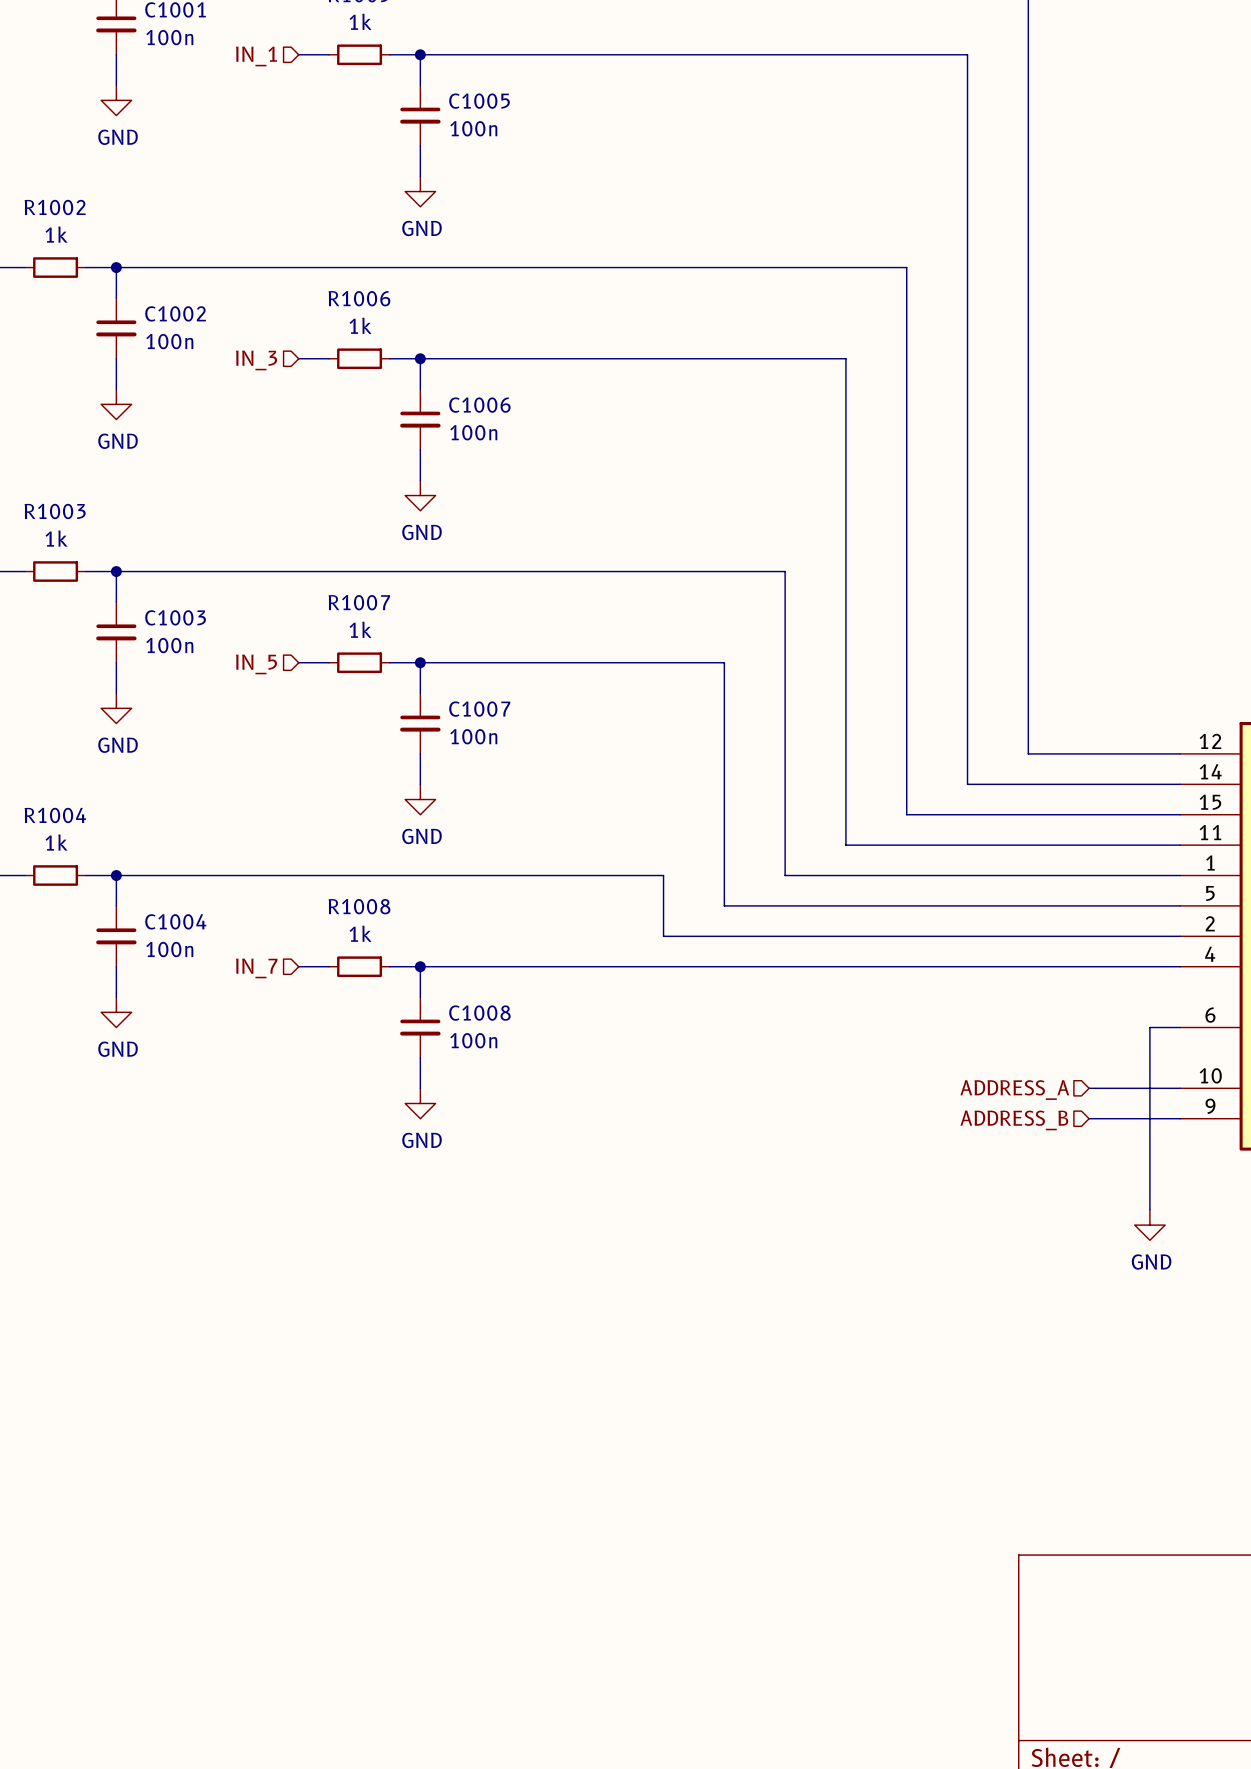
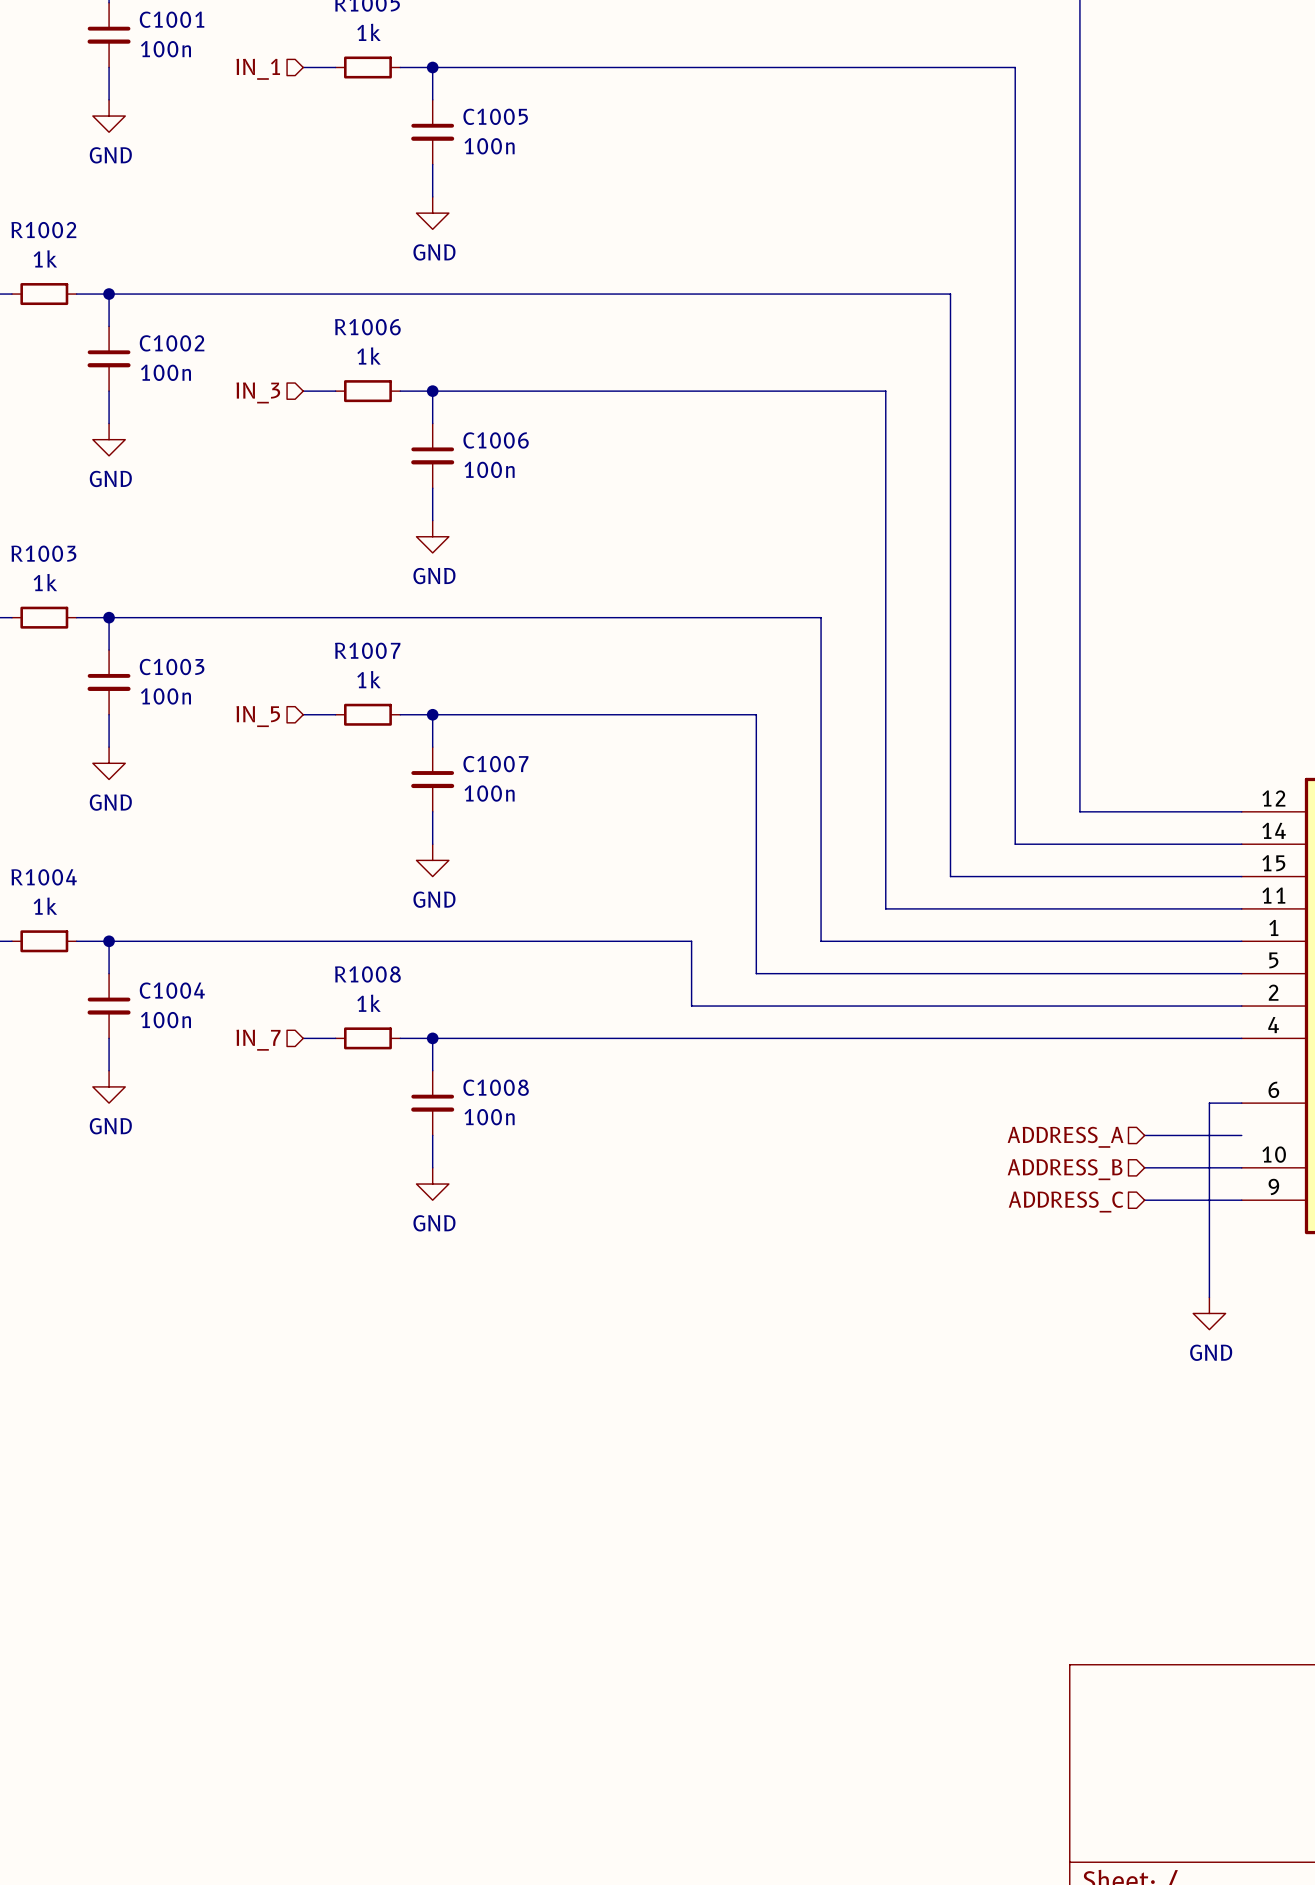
wire: none -> (1144, 1135) (1241, 1135)
hierarchical label: none -> ADDRESS_A (1065, 1137)
hierarchical label: ADDRESS_A (1014, 1090) -> ADDRESS_B (1065, 1169)
hierarchical label: ADDRESS_B (1014, 1120) -> ADDRESS_C (1066, 1202)

